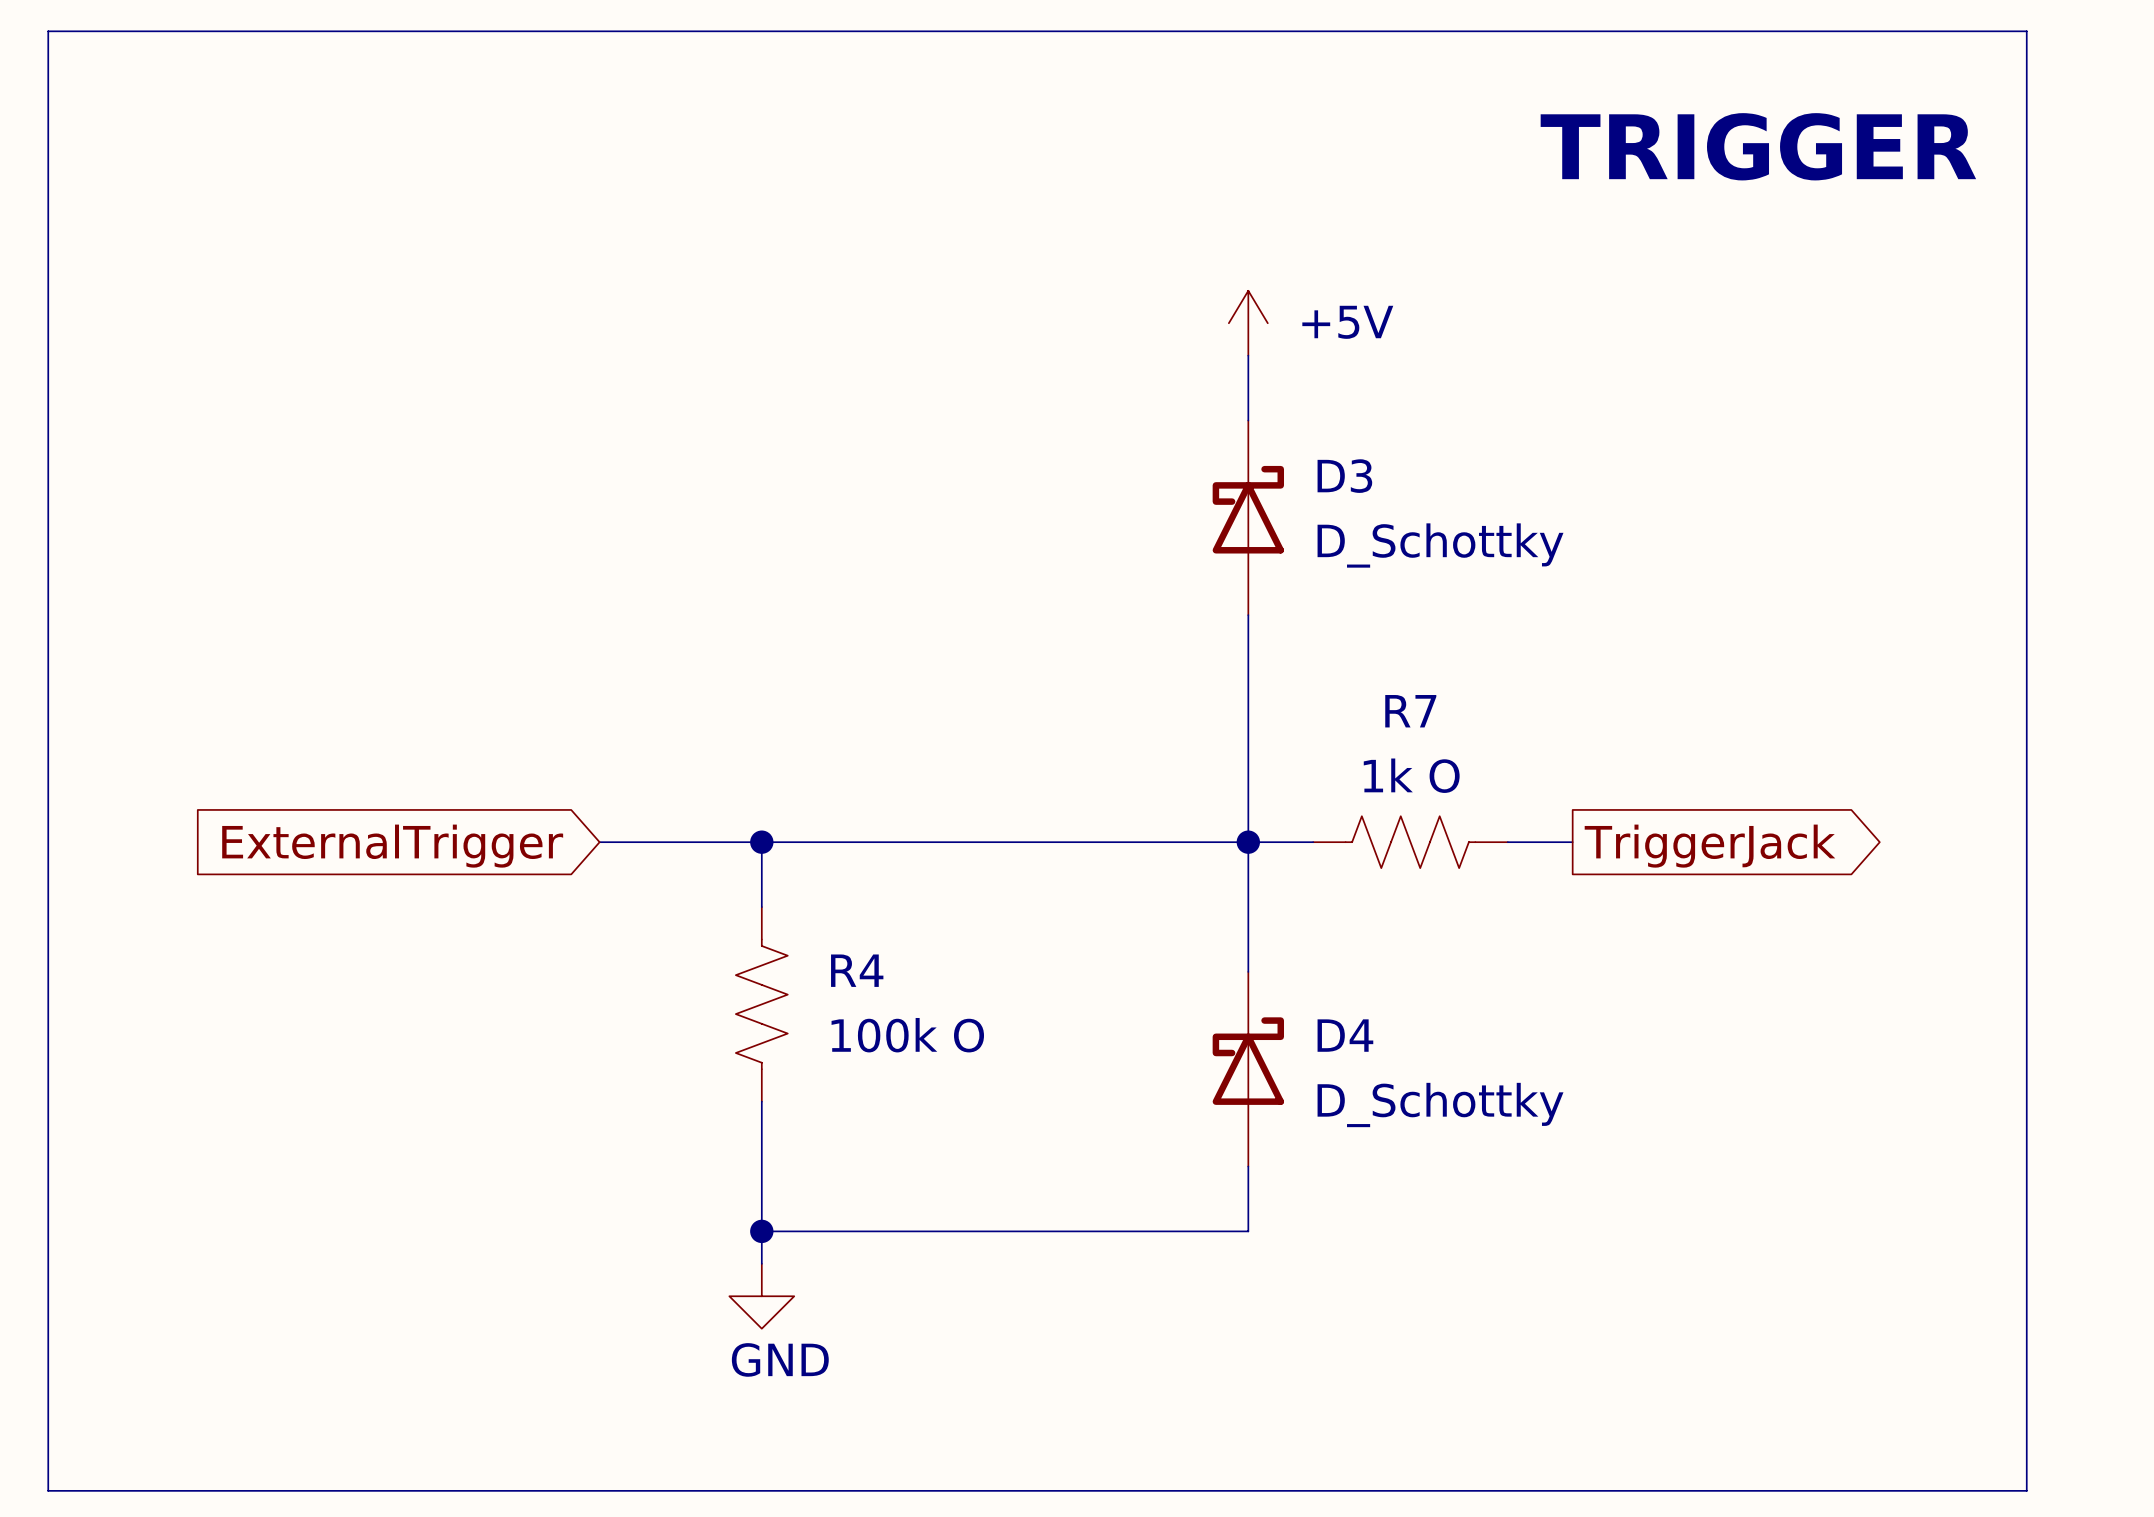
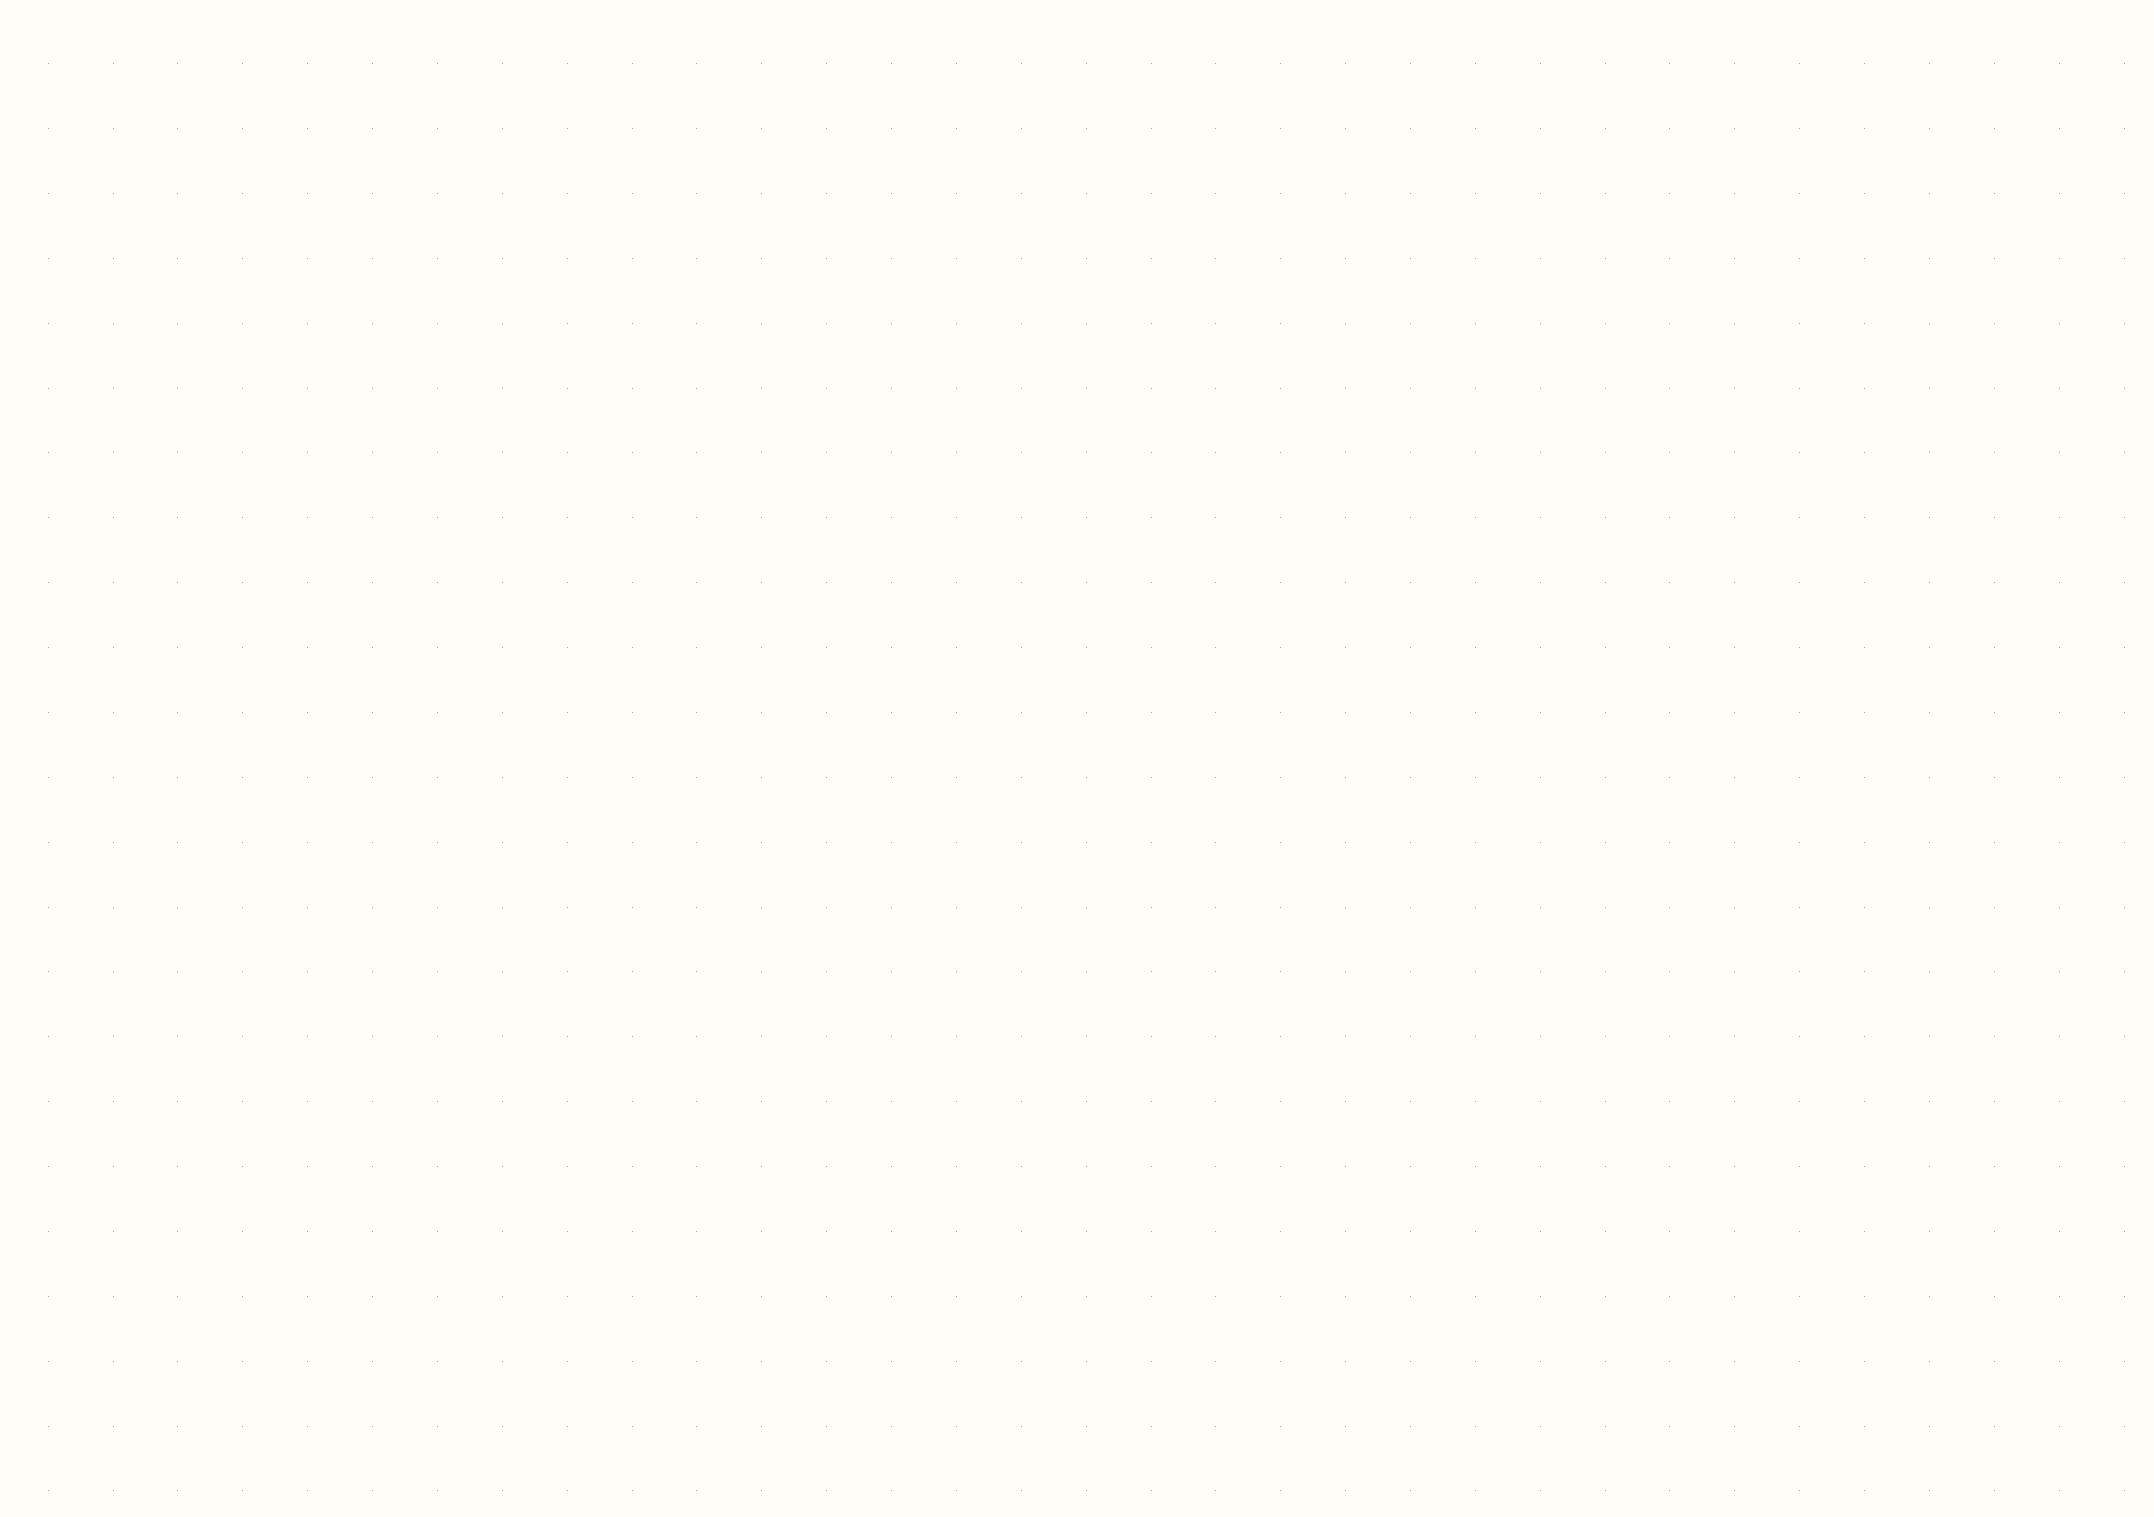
line: (48, 31) (48, 1490) (2026, 1490) (2026, 31) (48, 31) -> none
text: TRIGGER (1758, 146) -> none
power symbol: +5V (1248, 323) -> none
wire: (1248, 355) (1248, 420) -> none
D3: D_Schottky (1248, 517) -> none
wire: (1248, 615) (1248, 971) -> none
wire: (599, 842) (1313, 842) -> none
wire: (761, 842) (761, 907) -> none
junction: (761, 842) -> none
junction: (1248, 842) -> none
R7: 1k O (1410, 842) -> none
wire: (1507, 842) (1572, 842) -> none
global label: ExternalTrigger (392, 846) -> none
global label: TriggerJack (1709, 846) -> none
R4: 100k O (761, 1004) -> none
D4: D_Schottky (1248, 1069) -> none
wire: (761, 1101) (761, 1263) -> none
wire: (1248, 1166) (1248, 1231) (761, 1231) -> none
junction: (761, 1231) -> none
power symbol: GND (761, 1296) -> none

